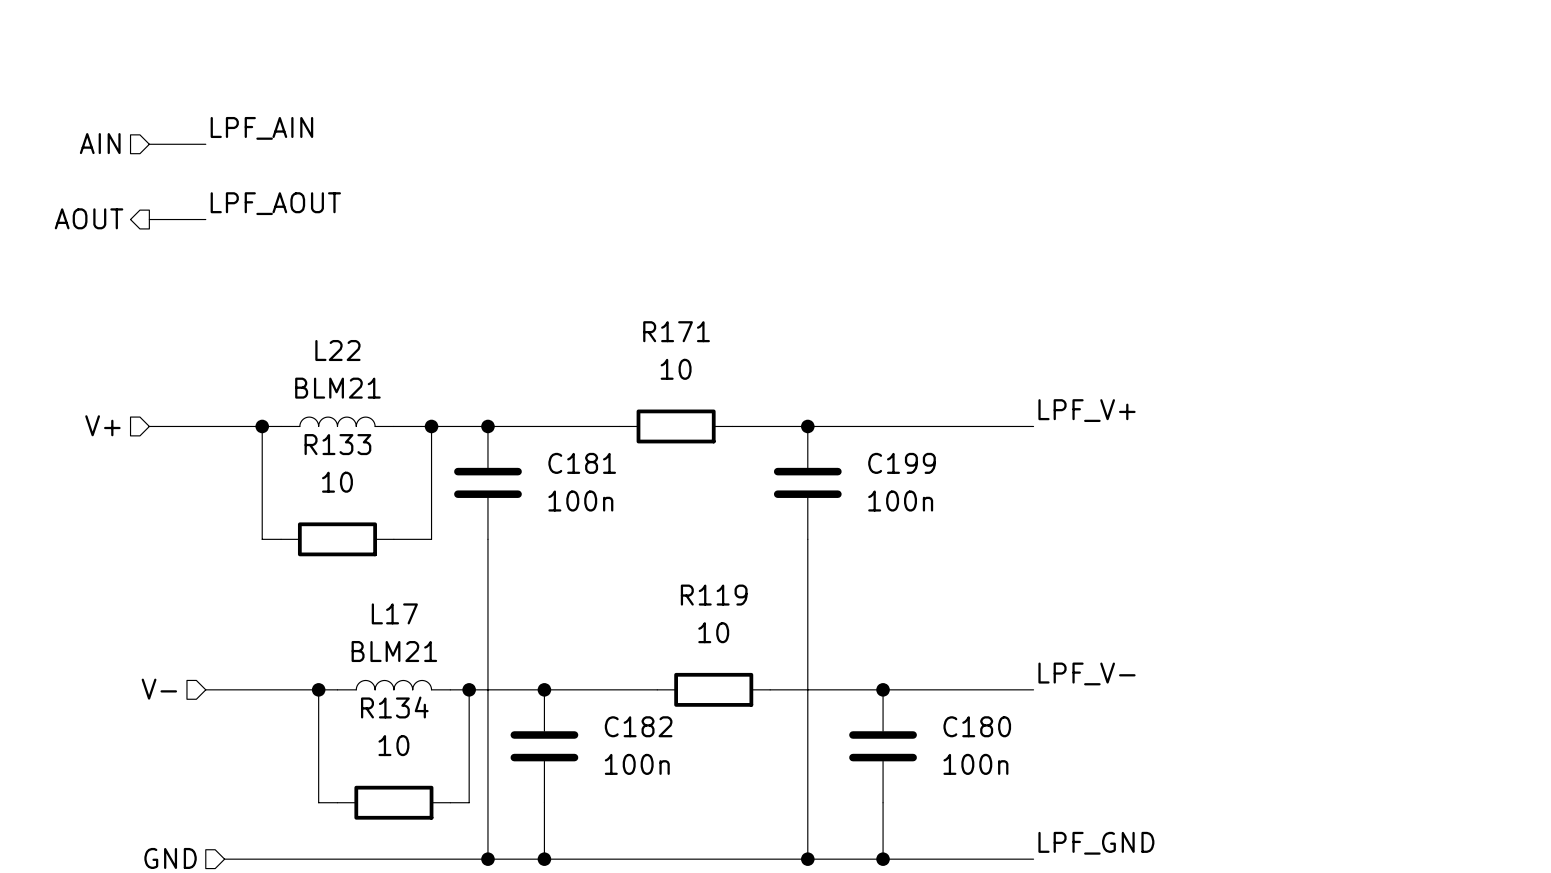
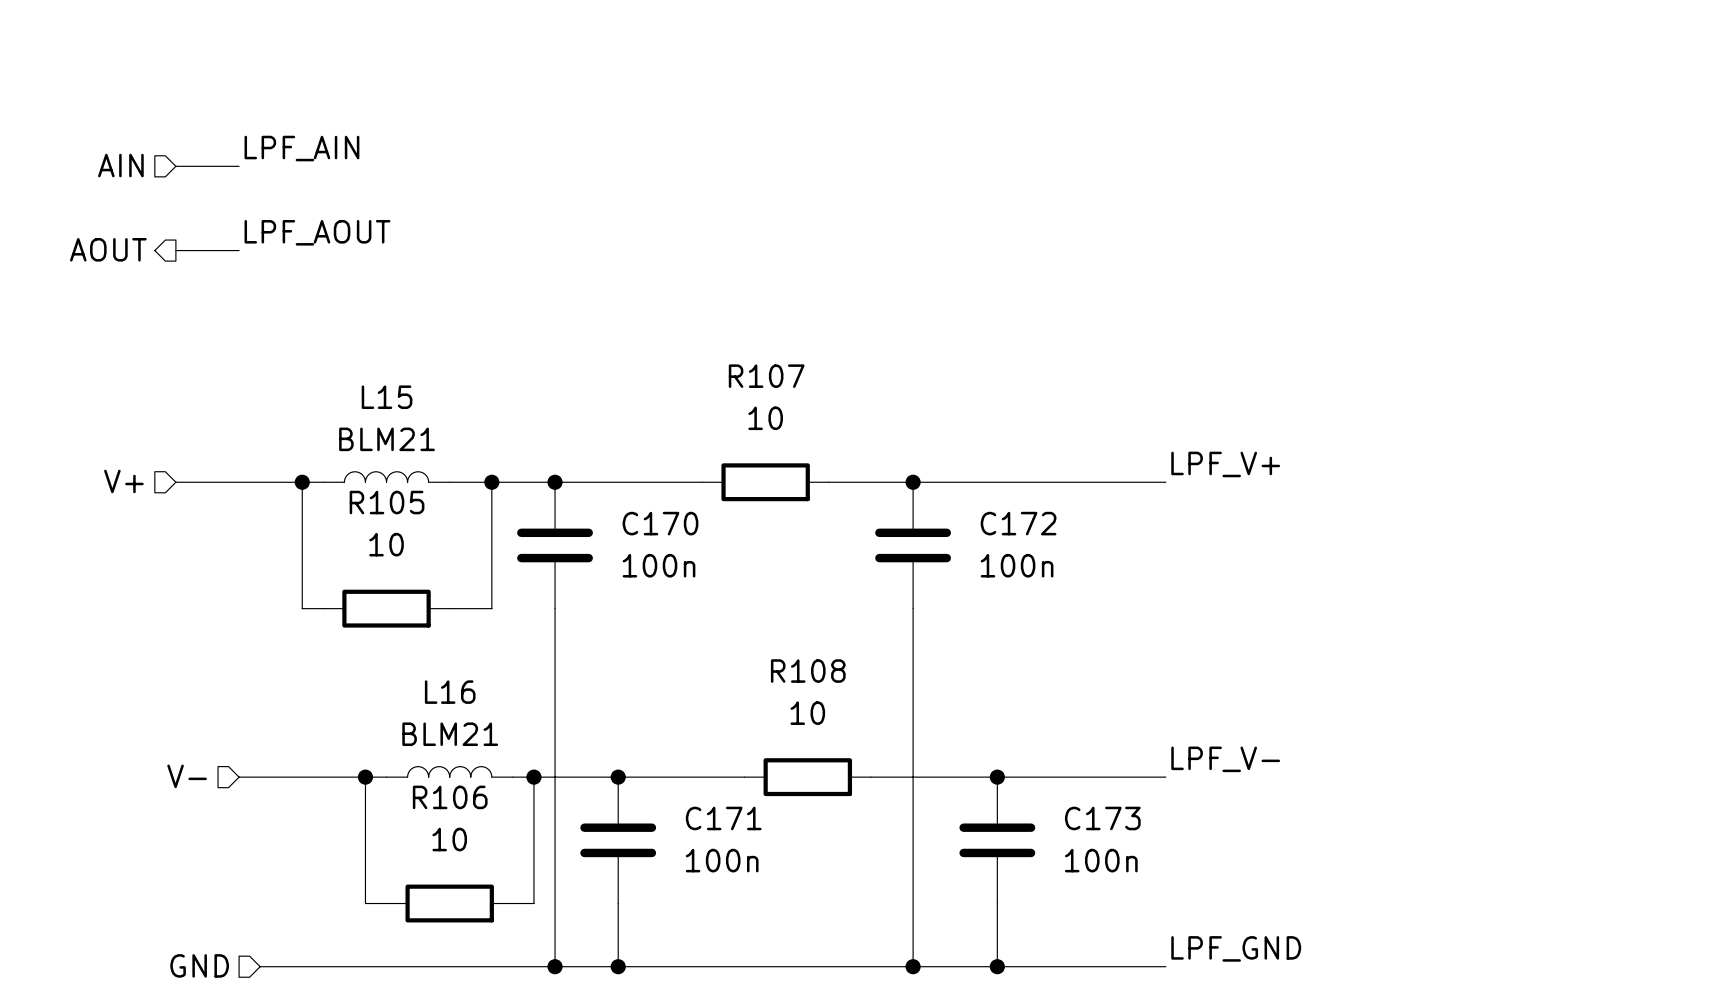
R171 name: R171 (676, 331) -> R107 (766, 376)
L22 name: L22 (337, 350) -> L15 (387, 397)
R133 name: R133 (337, 444) -> R105 (387, 502)
C181 name: C181 (582, 463) -> C170 (660, 523)
C199 name: C199 (902, 463) -> C172 (1018, 523)
R119 name: R119 (714, 595) -> R108 (808, 671)
L17 name: L17 (394, 613) -> L16 (450, 692)
R134 name: R134 (394, 707) -> R106 (450, 797)
C182 name: C182 (638, 726) -> C171 (723, 818)
C180 name: C180 (977, 726) -> C173 (1102, 818)

